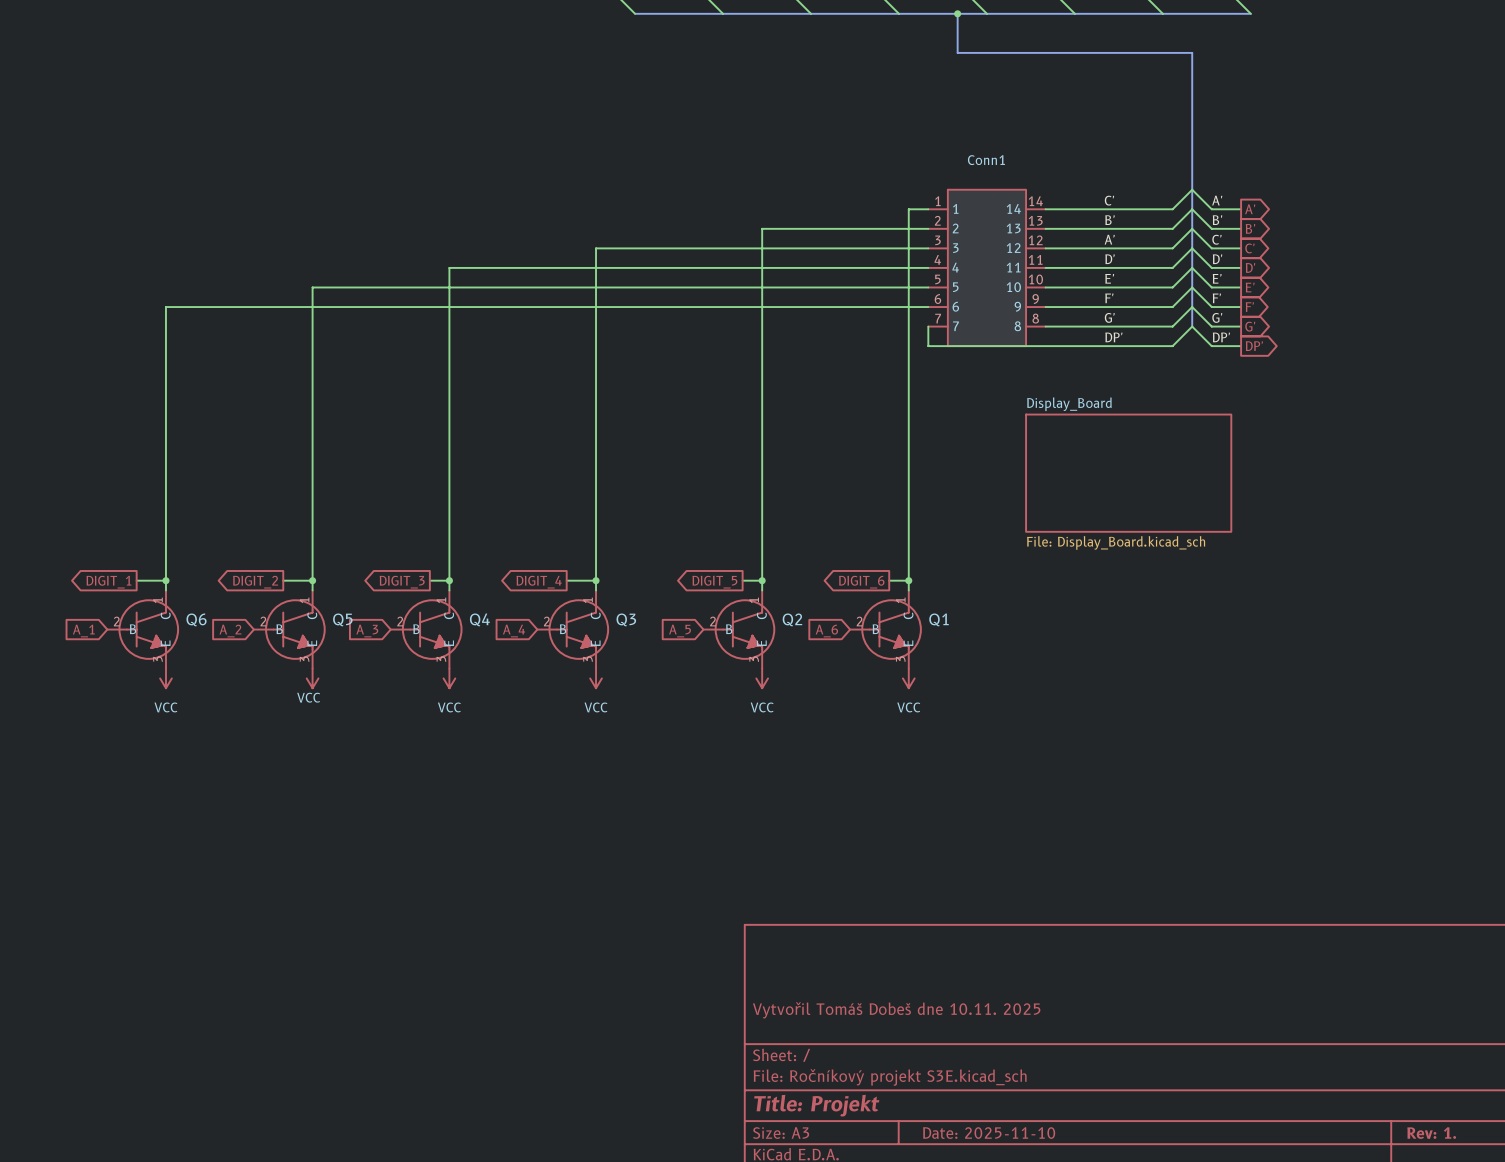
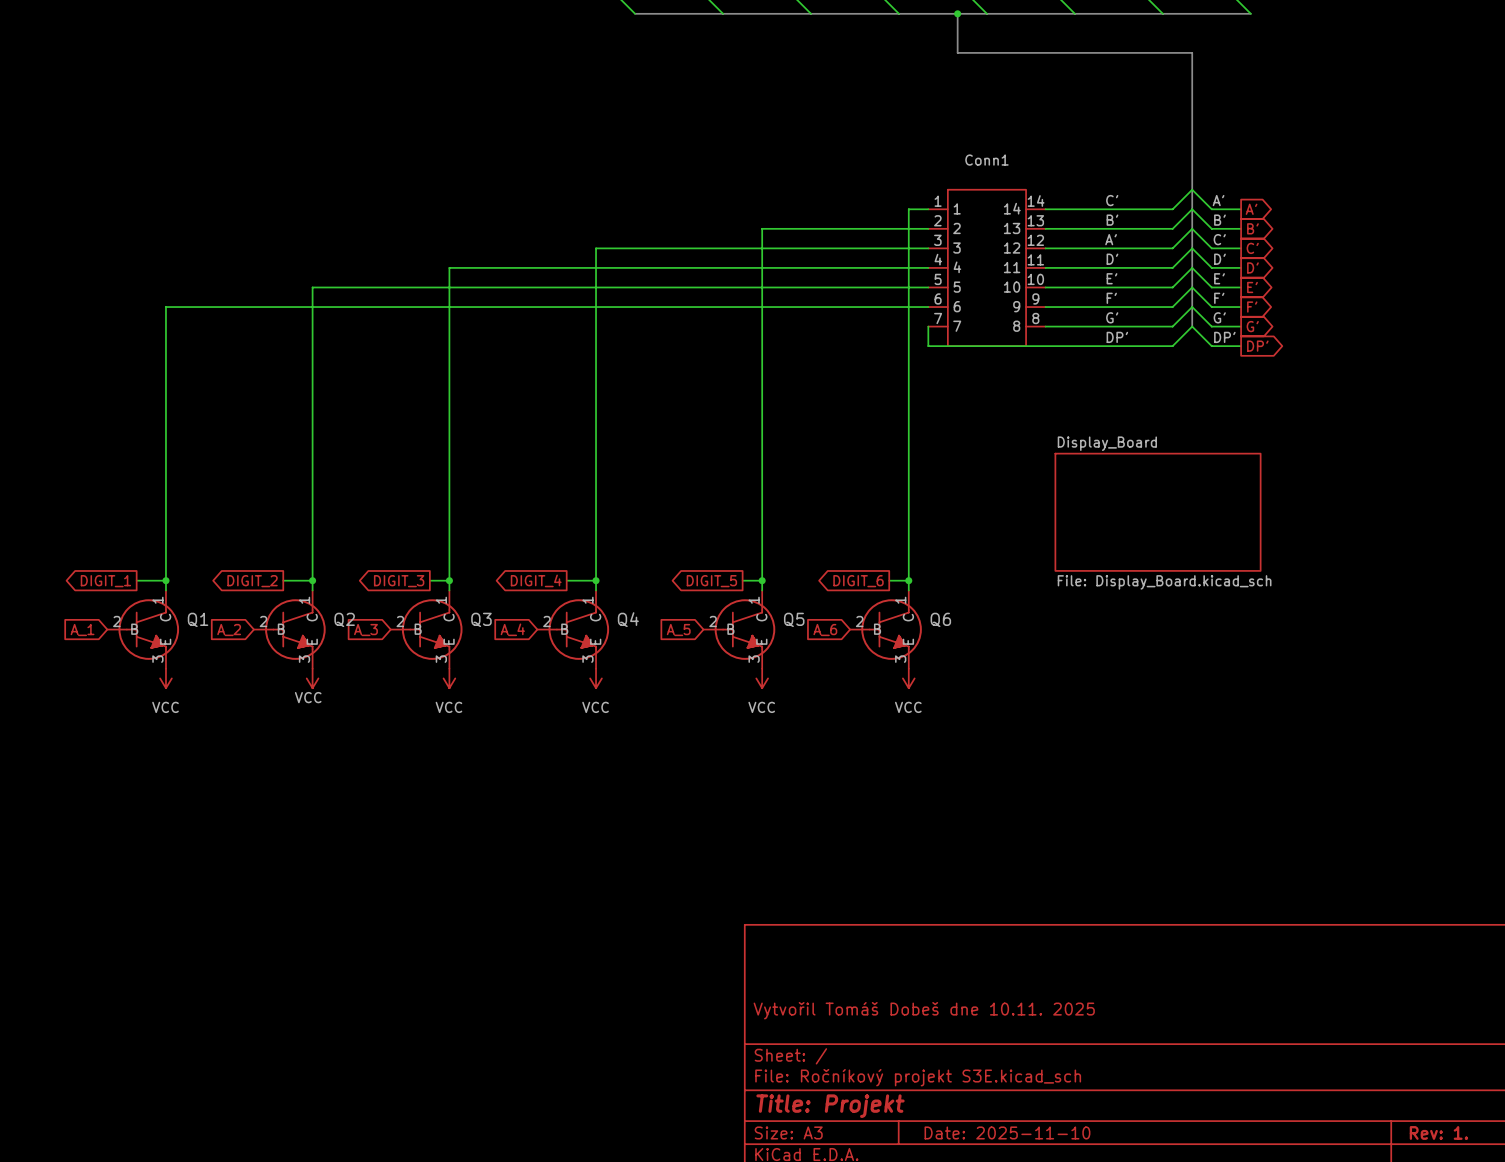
sheet Display_Board position: (1128, 473) -> (1158, 512)
Q6 name: Q6 (196, 619) -> Q1 (198, 619)
Q5 name: Q5 (342, 619) -> Q2 (344, 619)
Q4 name: Q4 (479, 619) -> Q3 (481, 619)
Q3 name: Q3 (626, 619) -> Q4 (628, 619)
Q2 name: Q2 (792, 619) -> Q5 (794, 619)
Q1 name: Q1 (939, 619) -> Q6 (940, 619)

